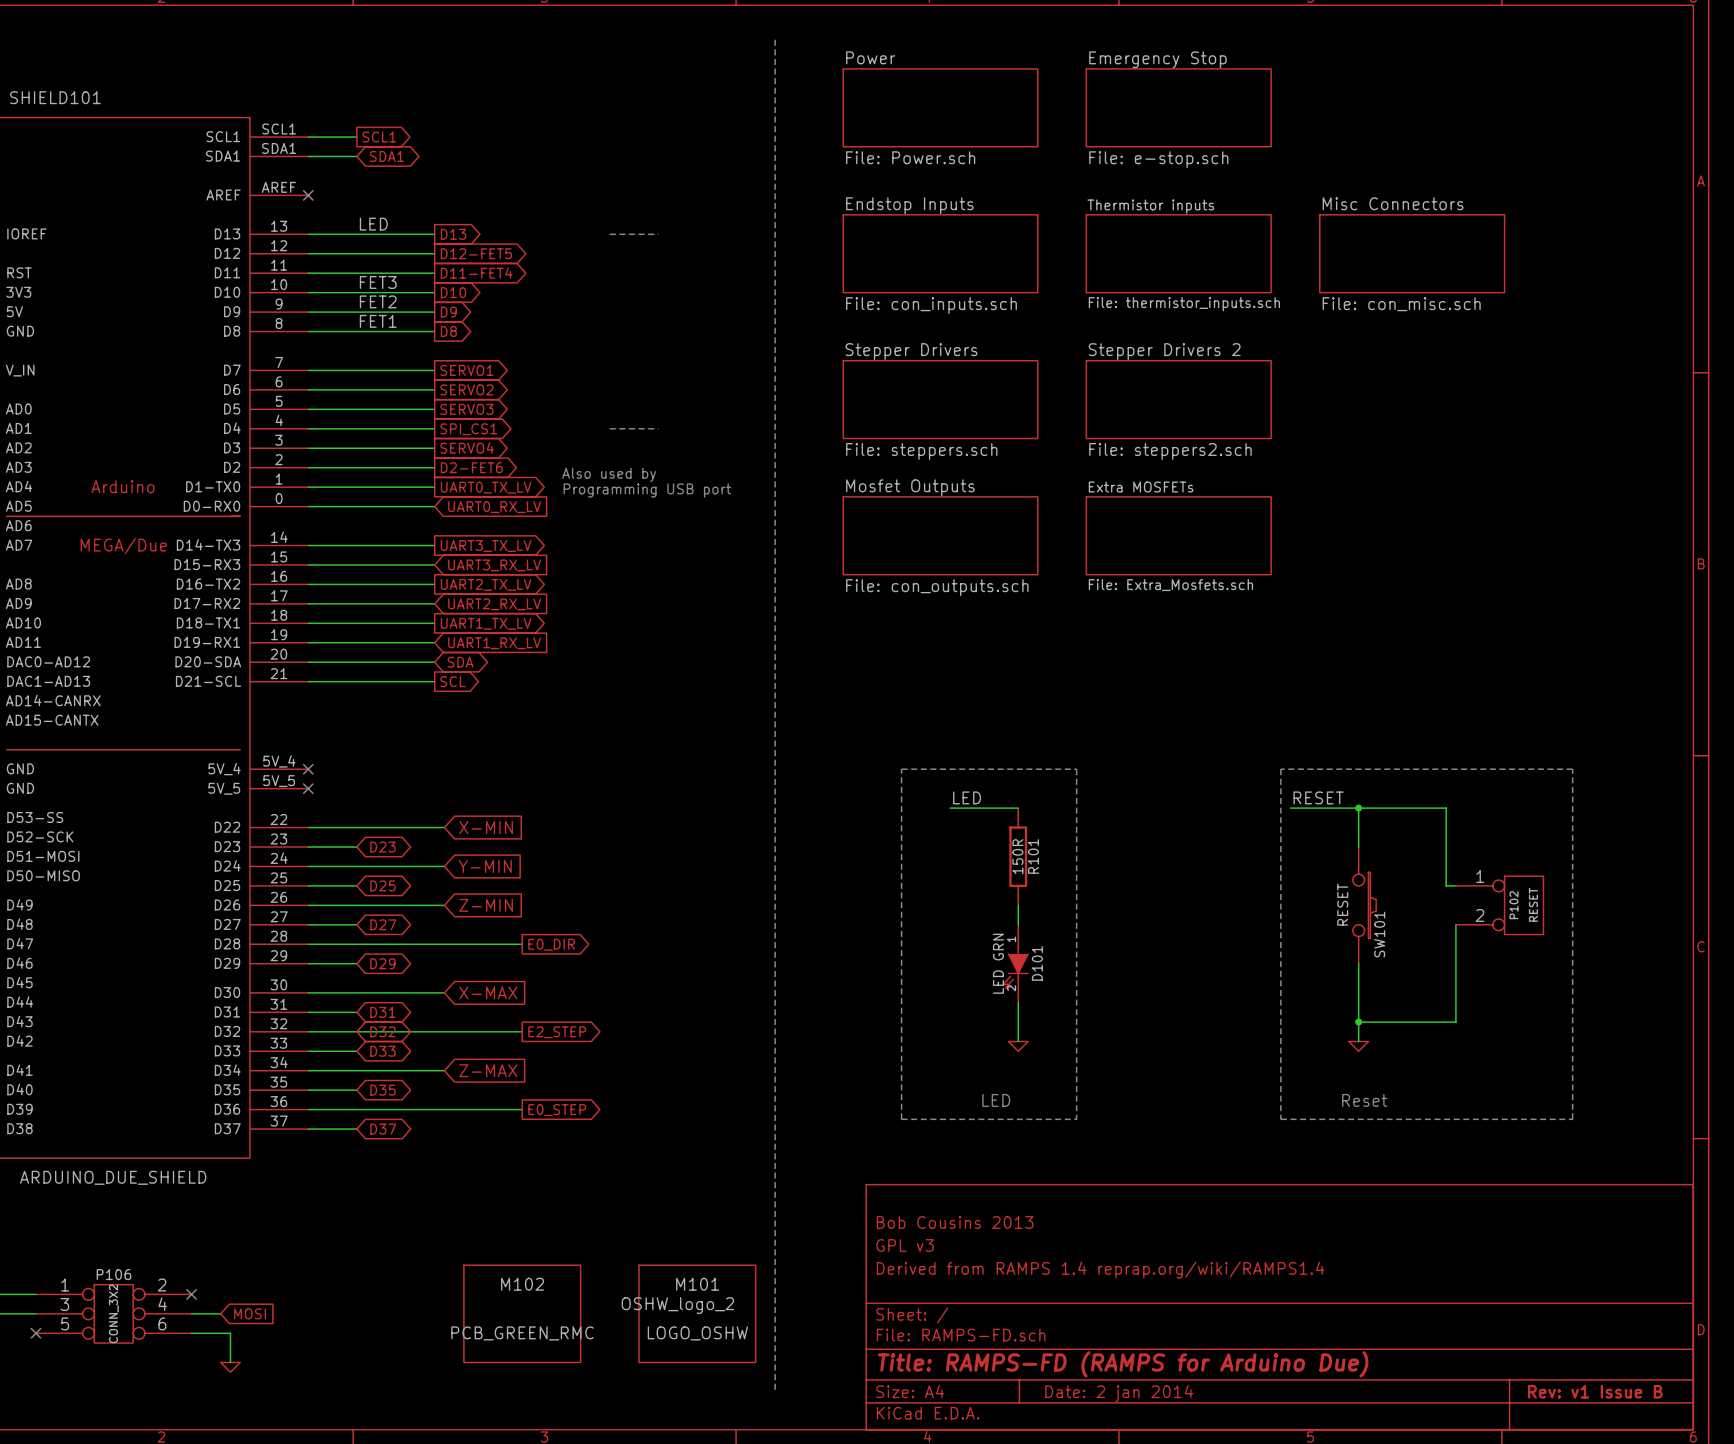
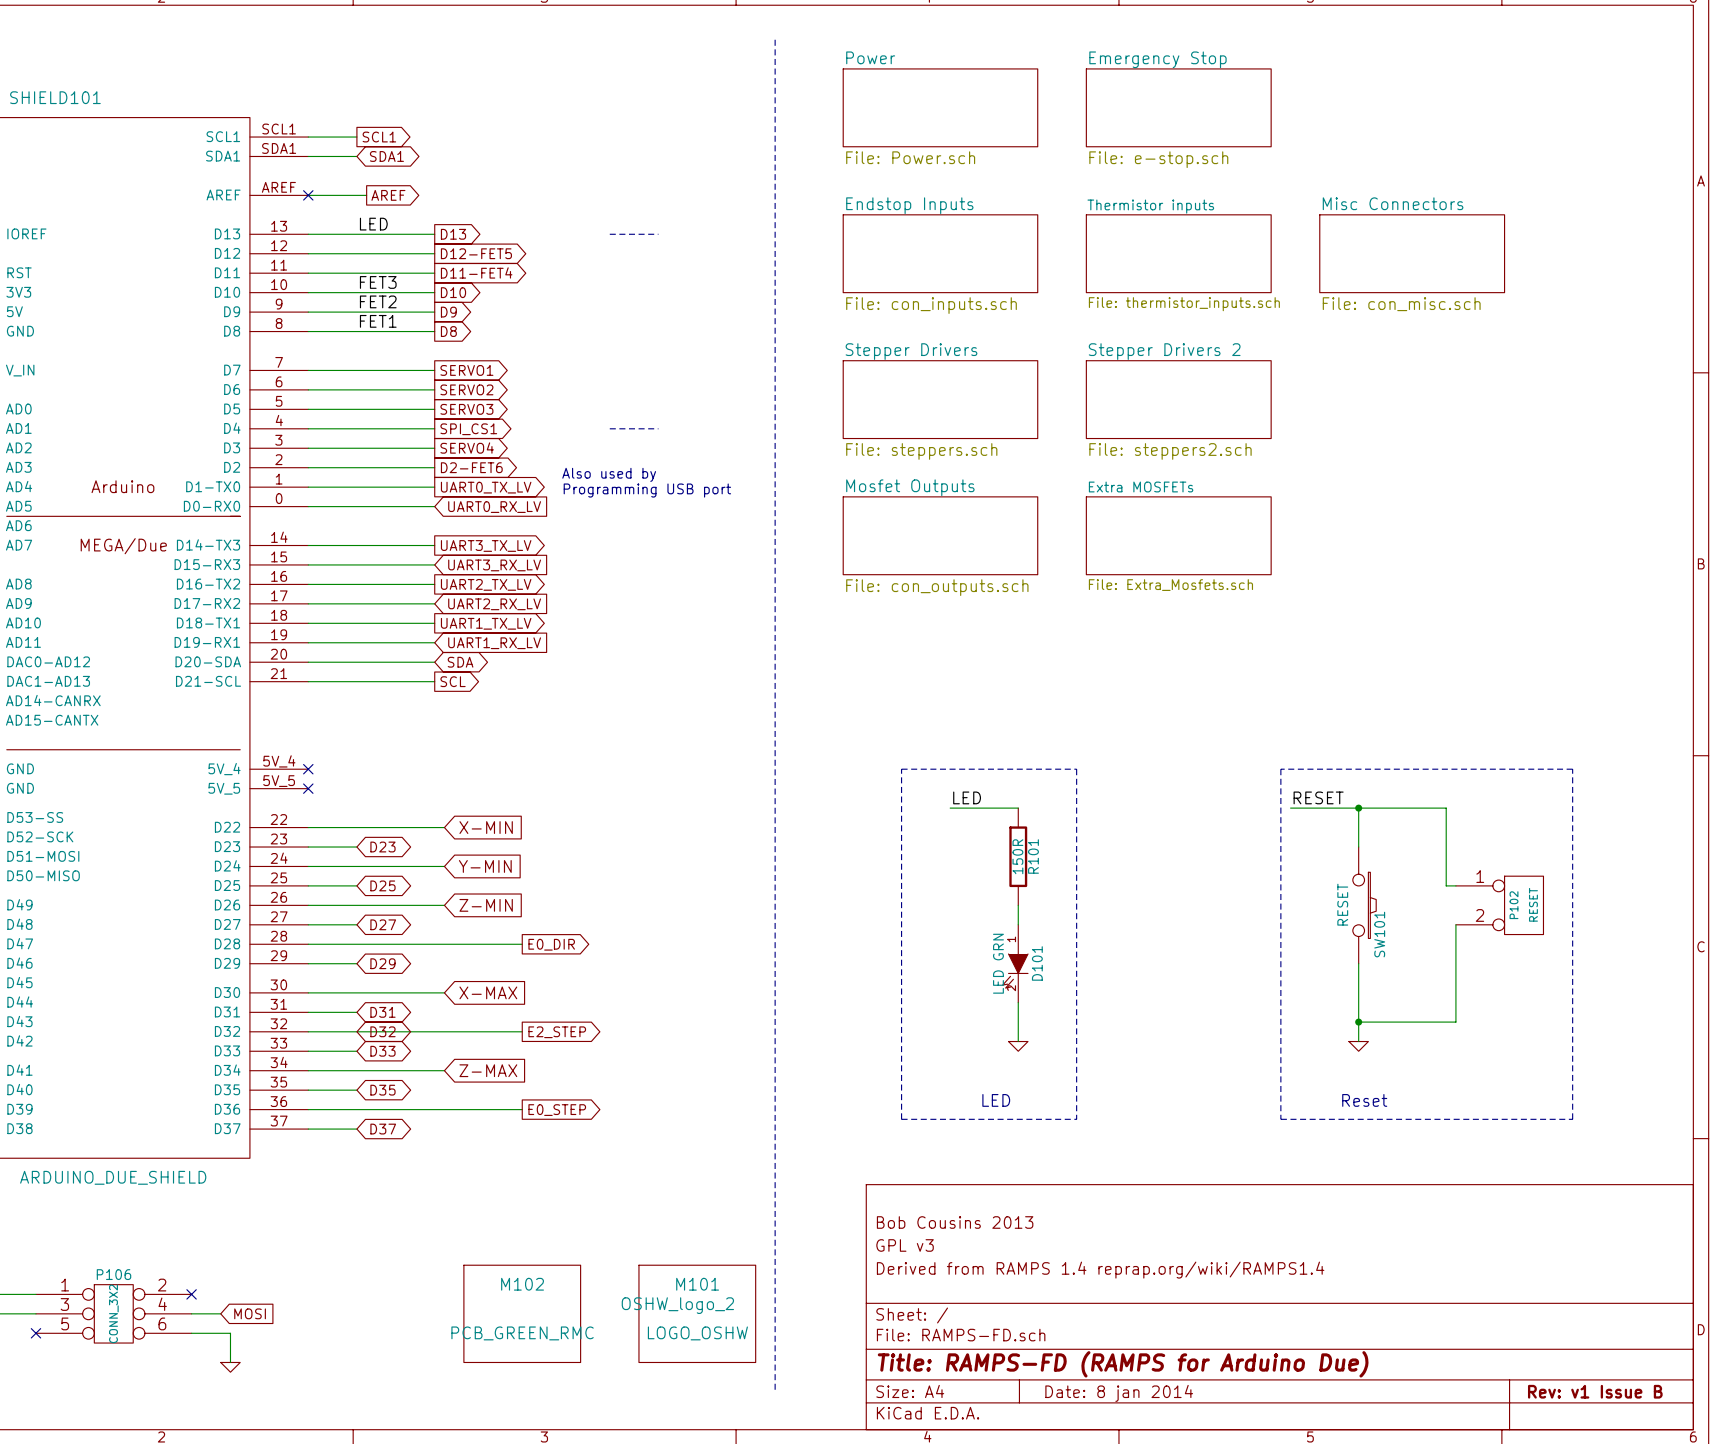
wire: none -> (308, 195) (366, 195)
global label: none -> AREF (388, 195)
title block: Date: 2 jan 2014 (1119, 1393) -> Date: 8 jan 2014 (1119, 1393)

